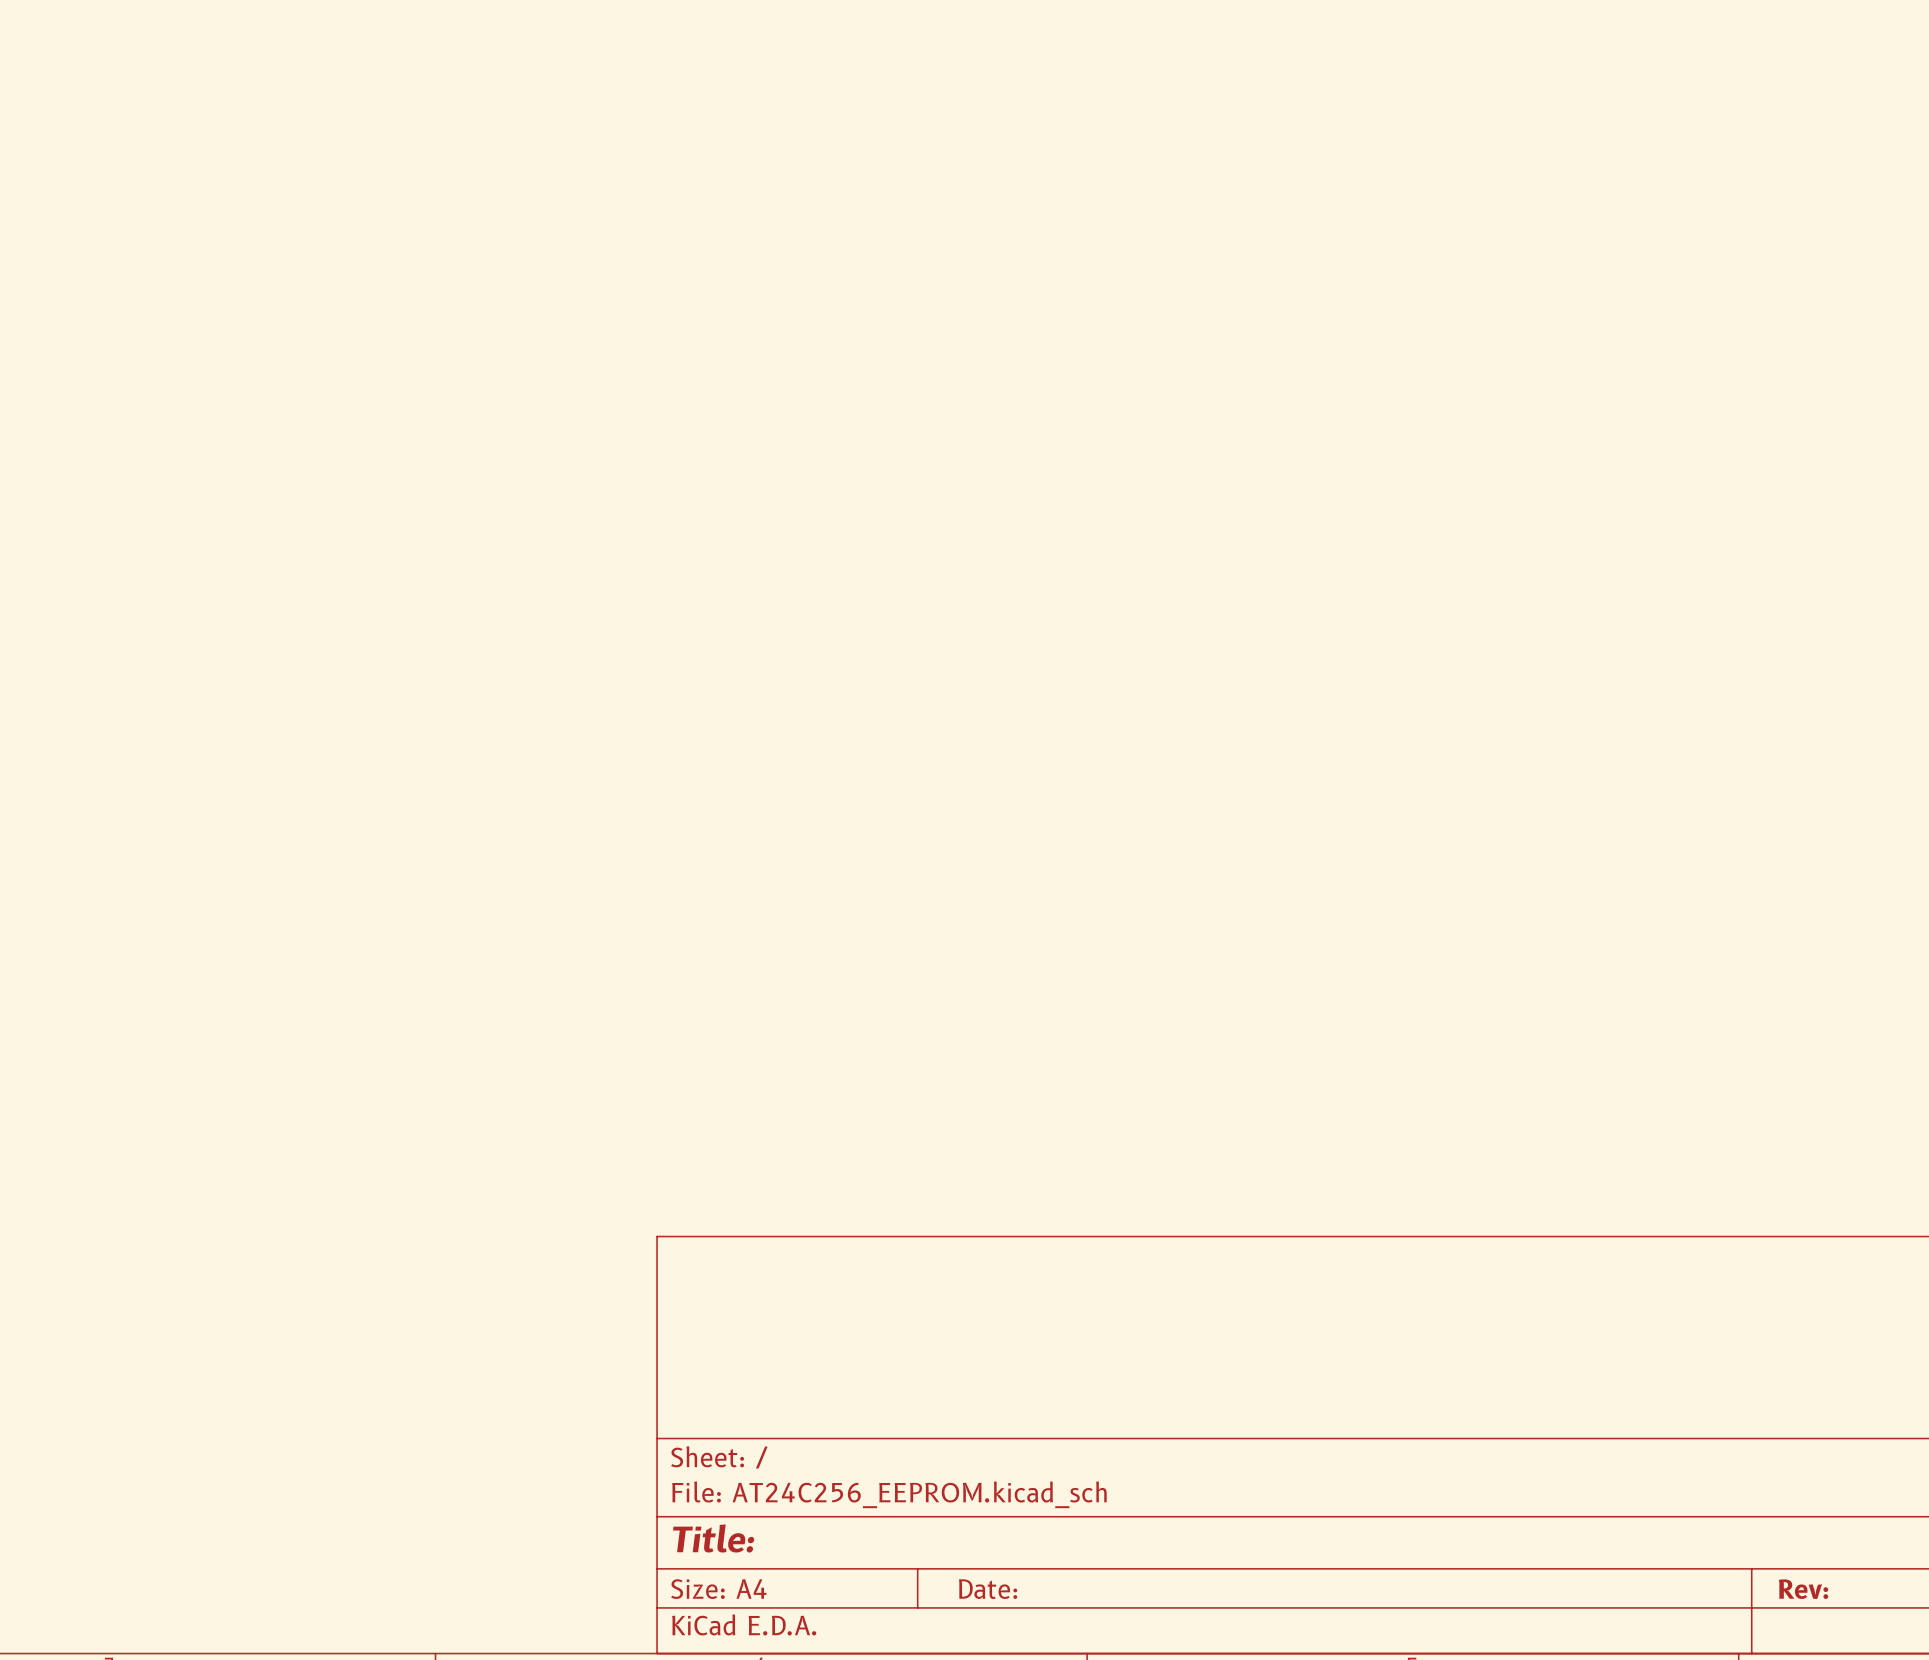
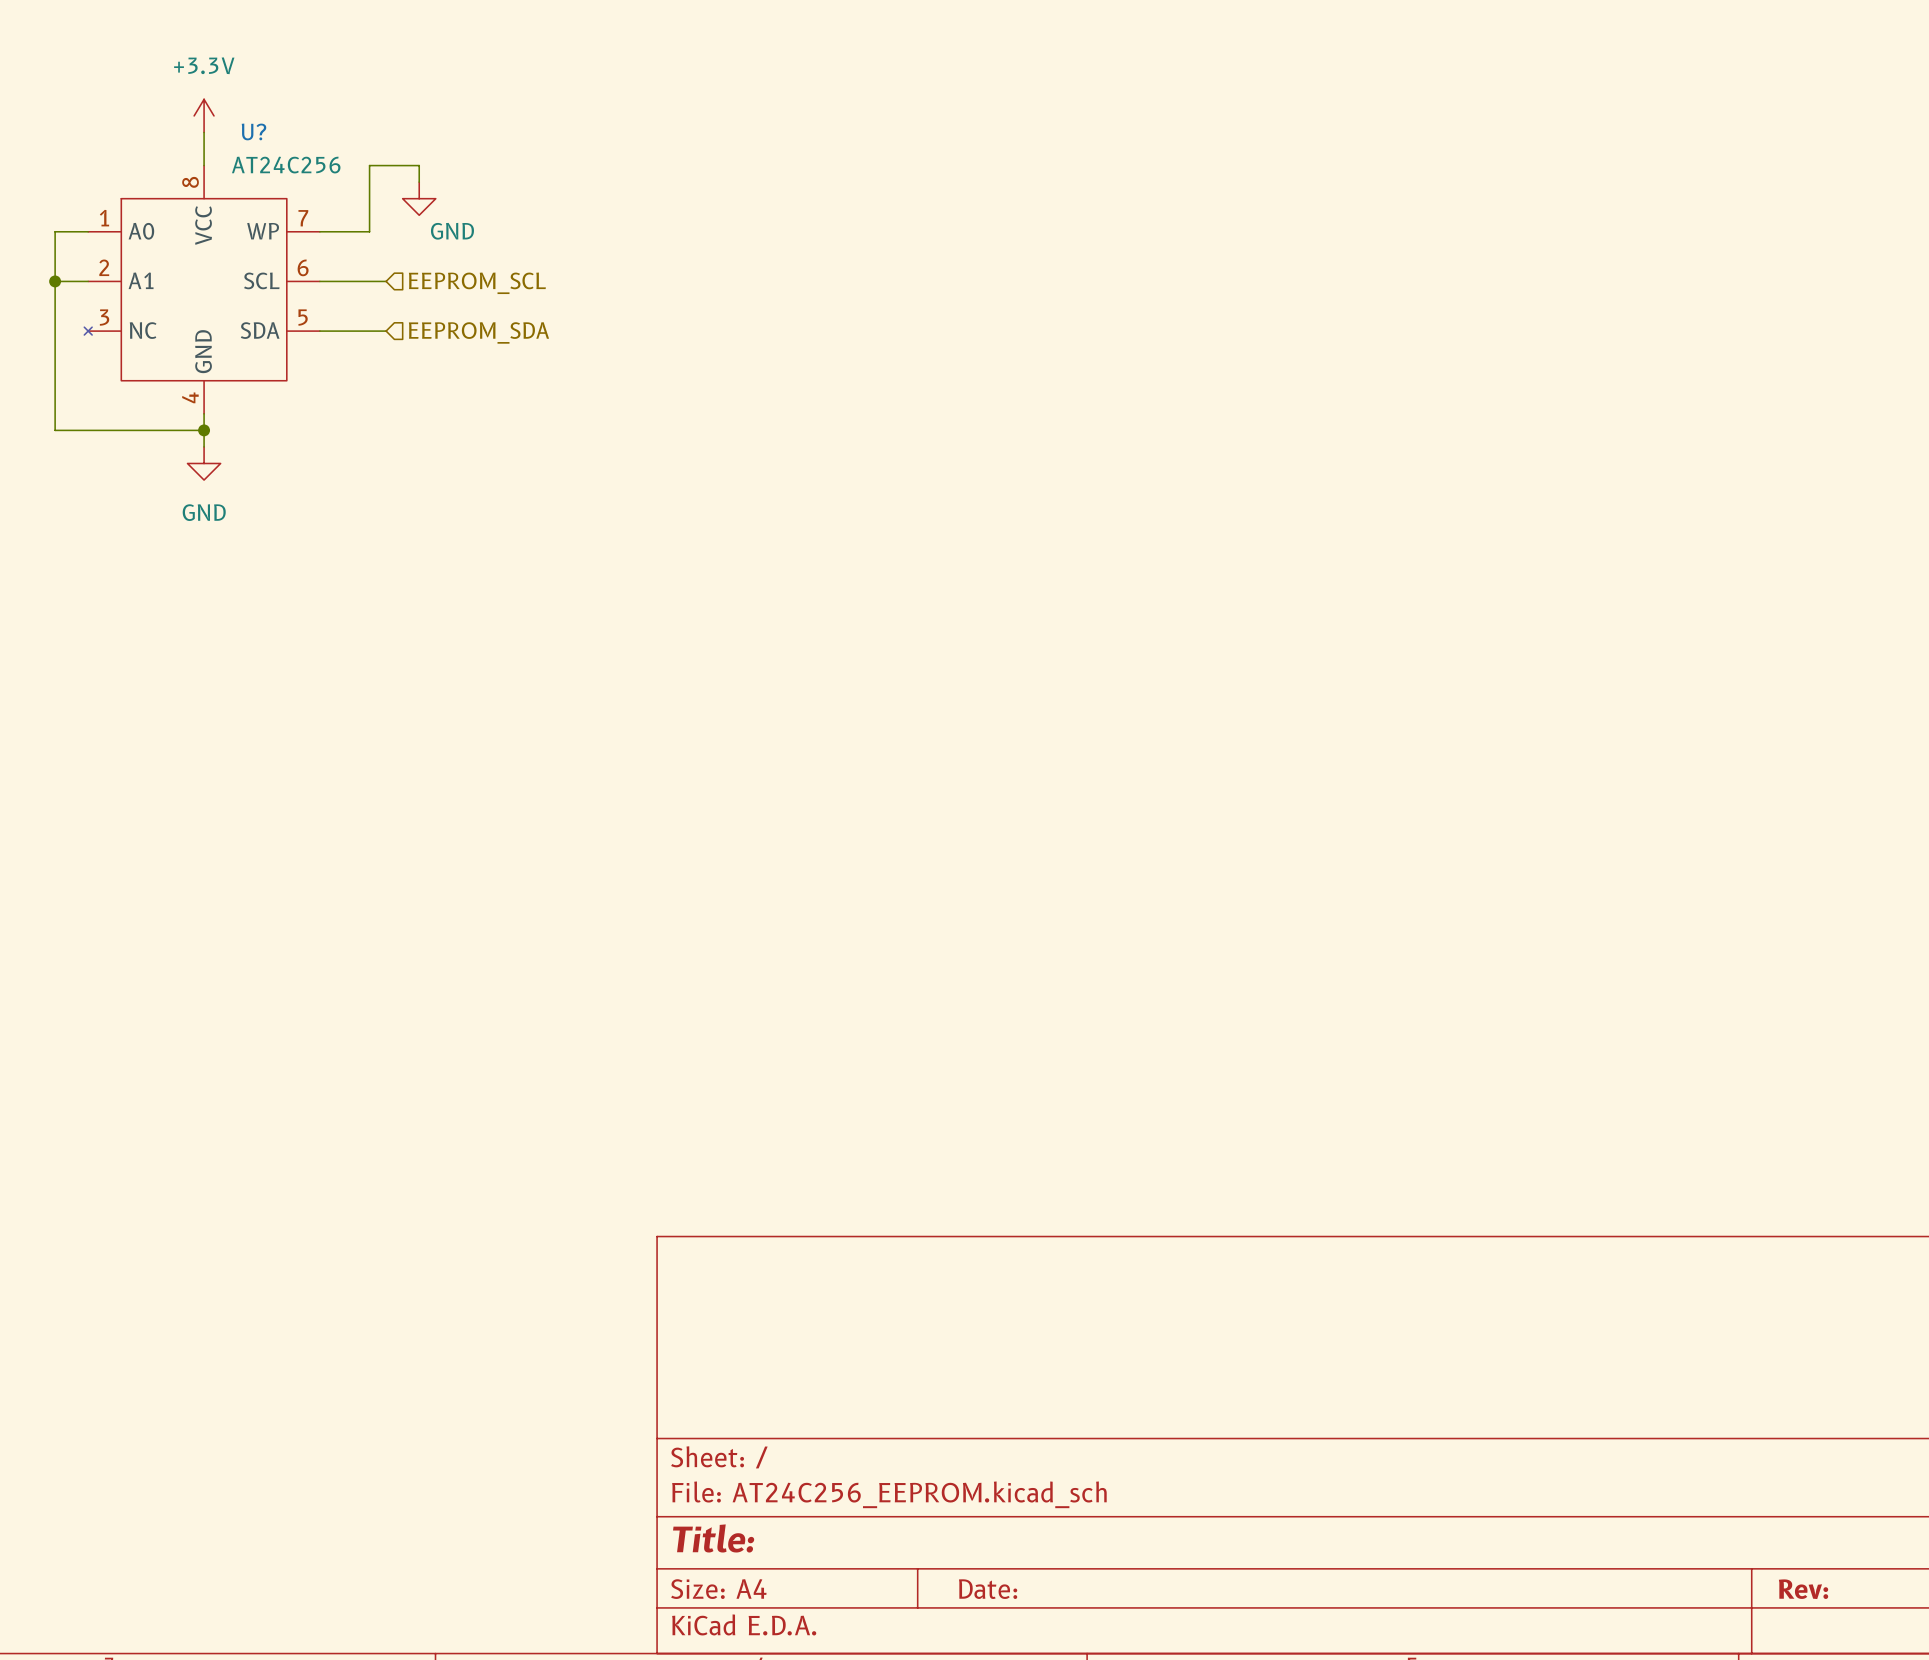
power symbol: none -> +3.3V (204, 115)
wire: none -> (204, 132) (204, 165)
wire: none -> (419, 182) (419, 165) (369, 165) (369, 231) (319, 231)
power symbol: none -> GND (419, 198)
wire: none -> (88, 231) (55, 231) (55, 430) (204, 430)
wire: none -> (55, 281) (88, 281)
junction: none -> (55, 281)
wire: none -> (319, 281) (386, 281)
hierarchical label: none -> EEPROM_SCL (477, 283)
U?: none -> AT24C256 (202, 289)
wire: none -> (319, 331) (386, 331)
hierarchical label: none -> EEPROM_SDA (478, 332)
wire: none -> (204, 413) (204, 446)
junction: none -> (204, 430)
power symbol: none -> GND (204, 463)

